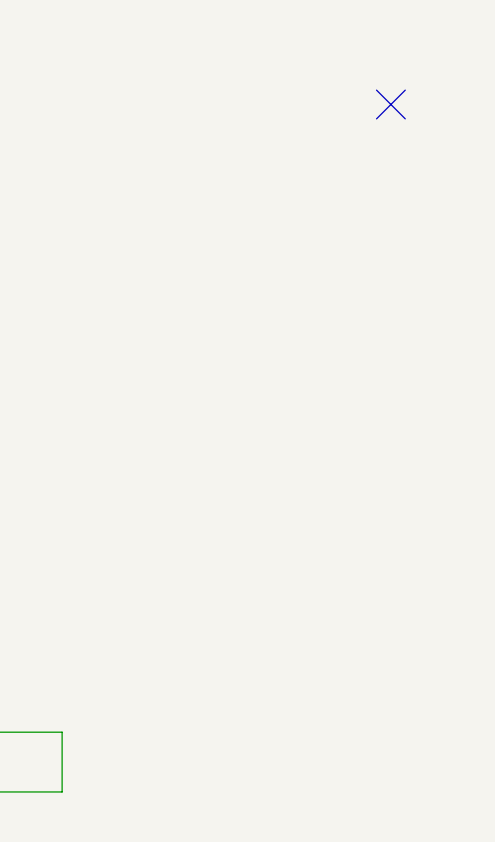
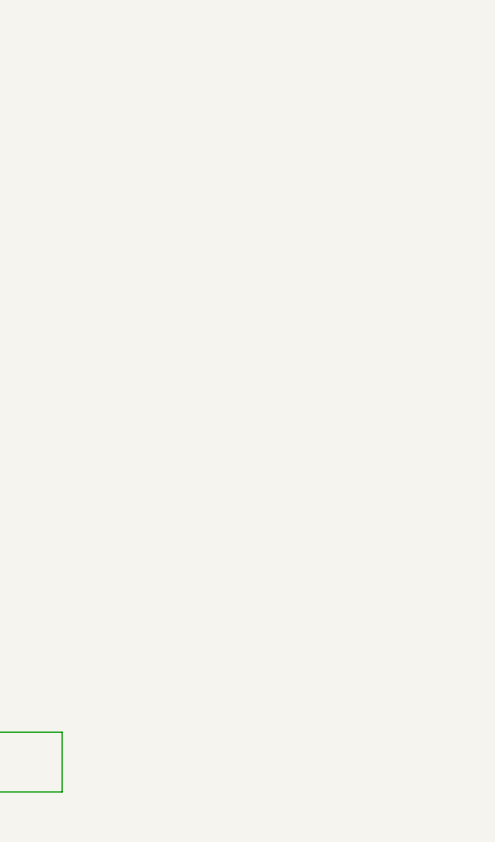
no-connect mark: (390, 104) -> none

